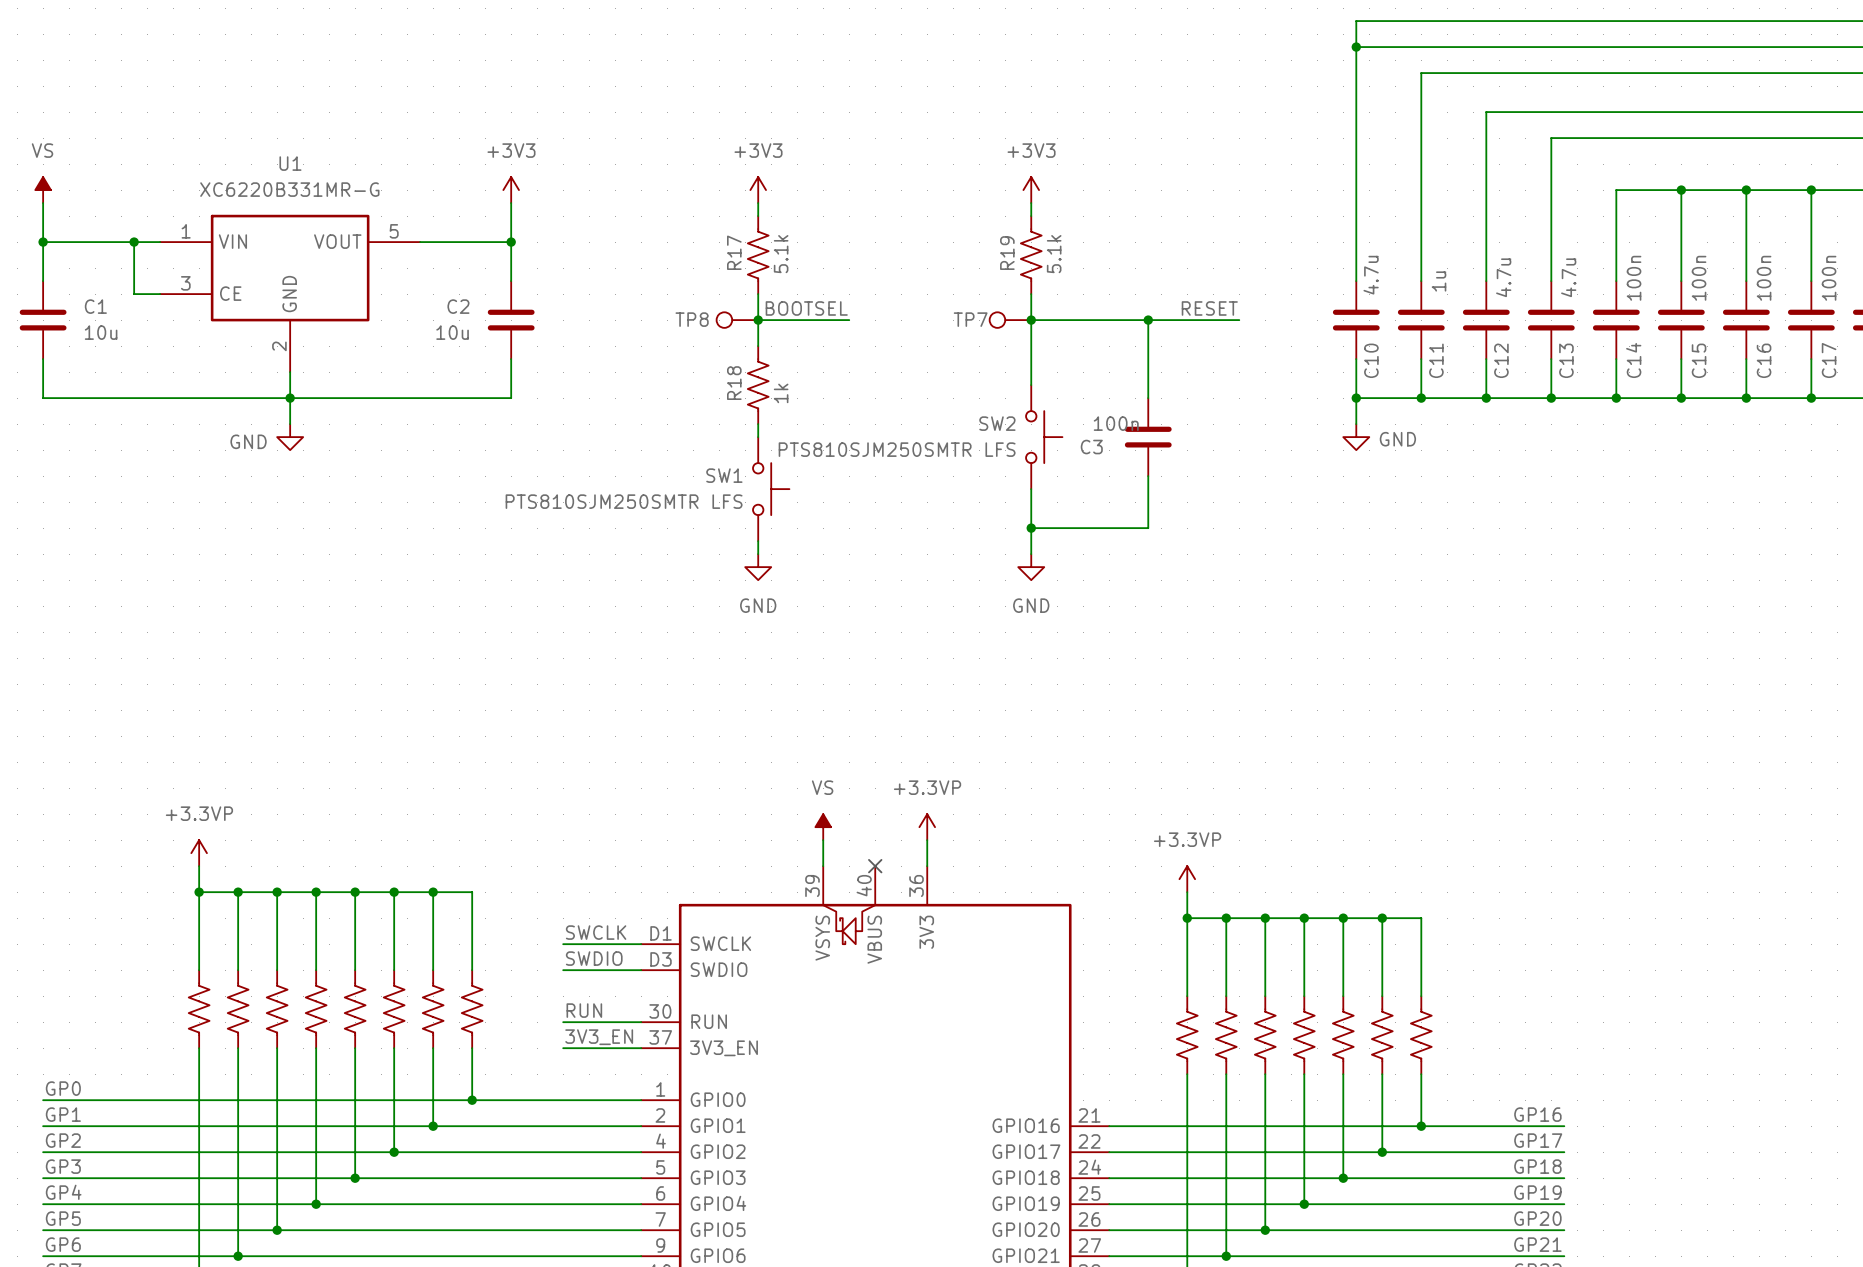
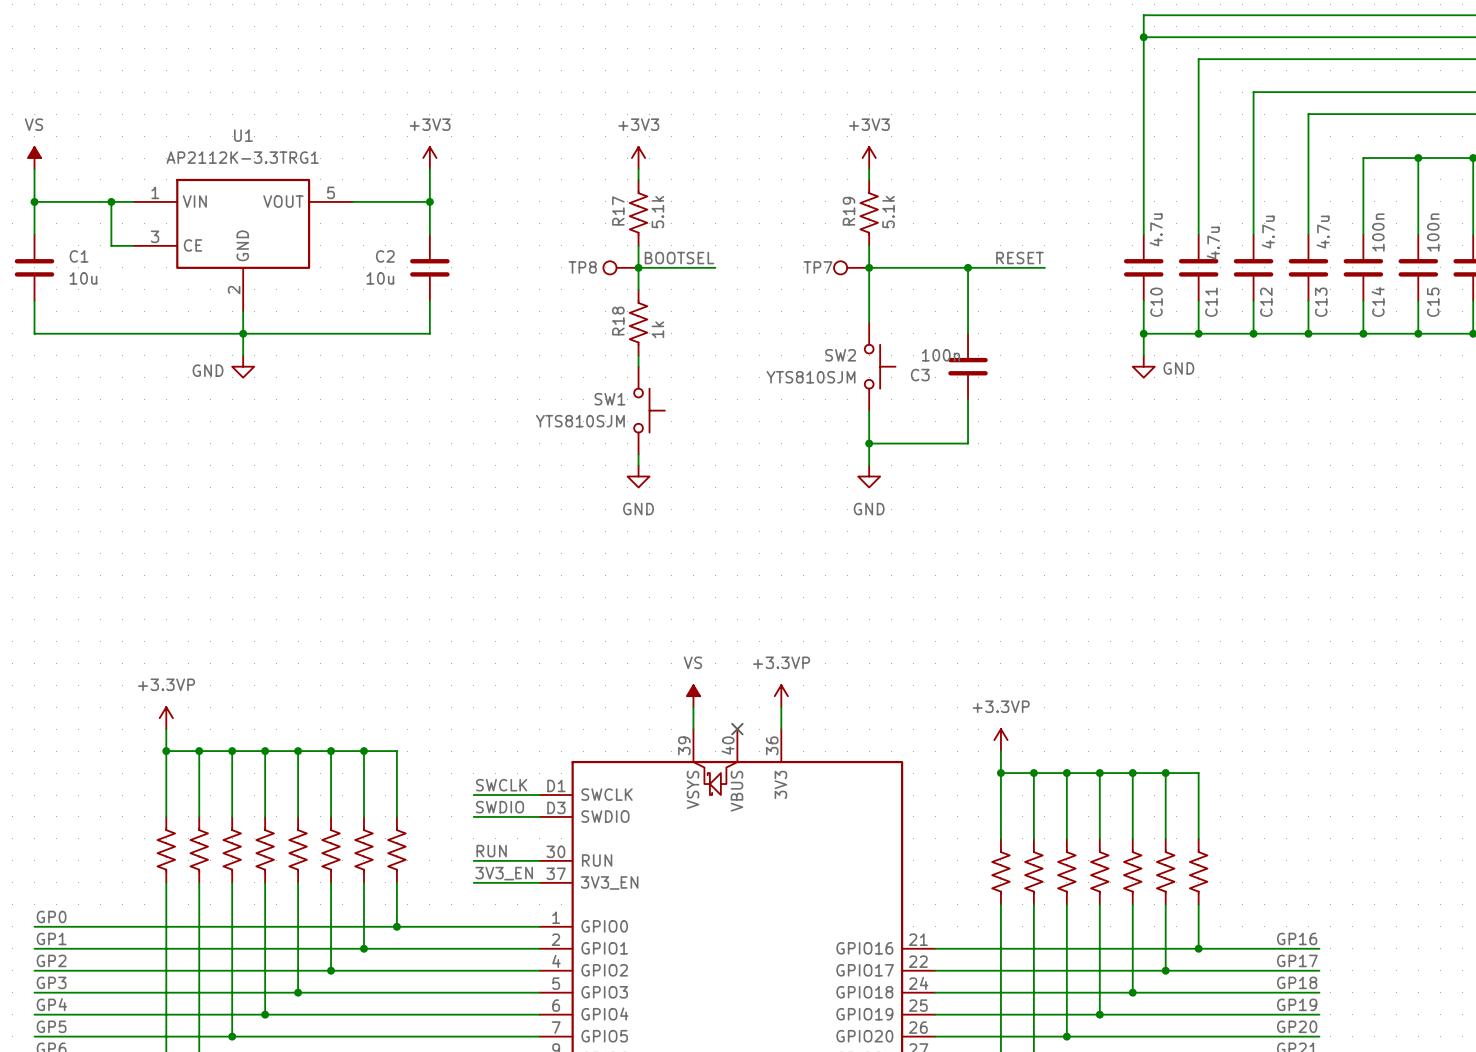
U1 value: XC6220B331MR-G (289, 189) -> AP2112K-3.3TRG1 (242, 157)
C11 value: 1u (1439, 281) -> 4.7u (1213, 243)
SW2 value: PTS810SJM250SMTR LFS (897, 449) -> YTS810SJM (811, 377)
SW1 value: PTS810SJM250SMTR LFS (624, 501) -> YTS810SJM (580, 421)

